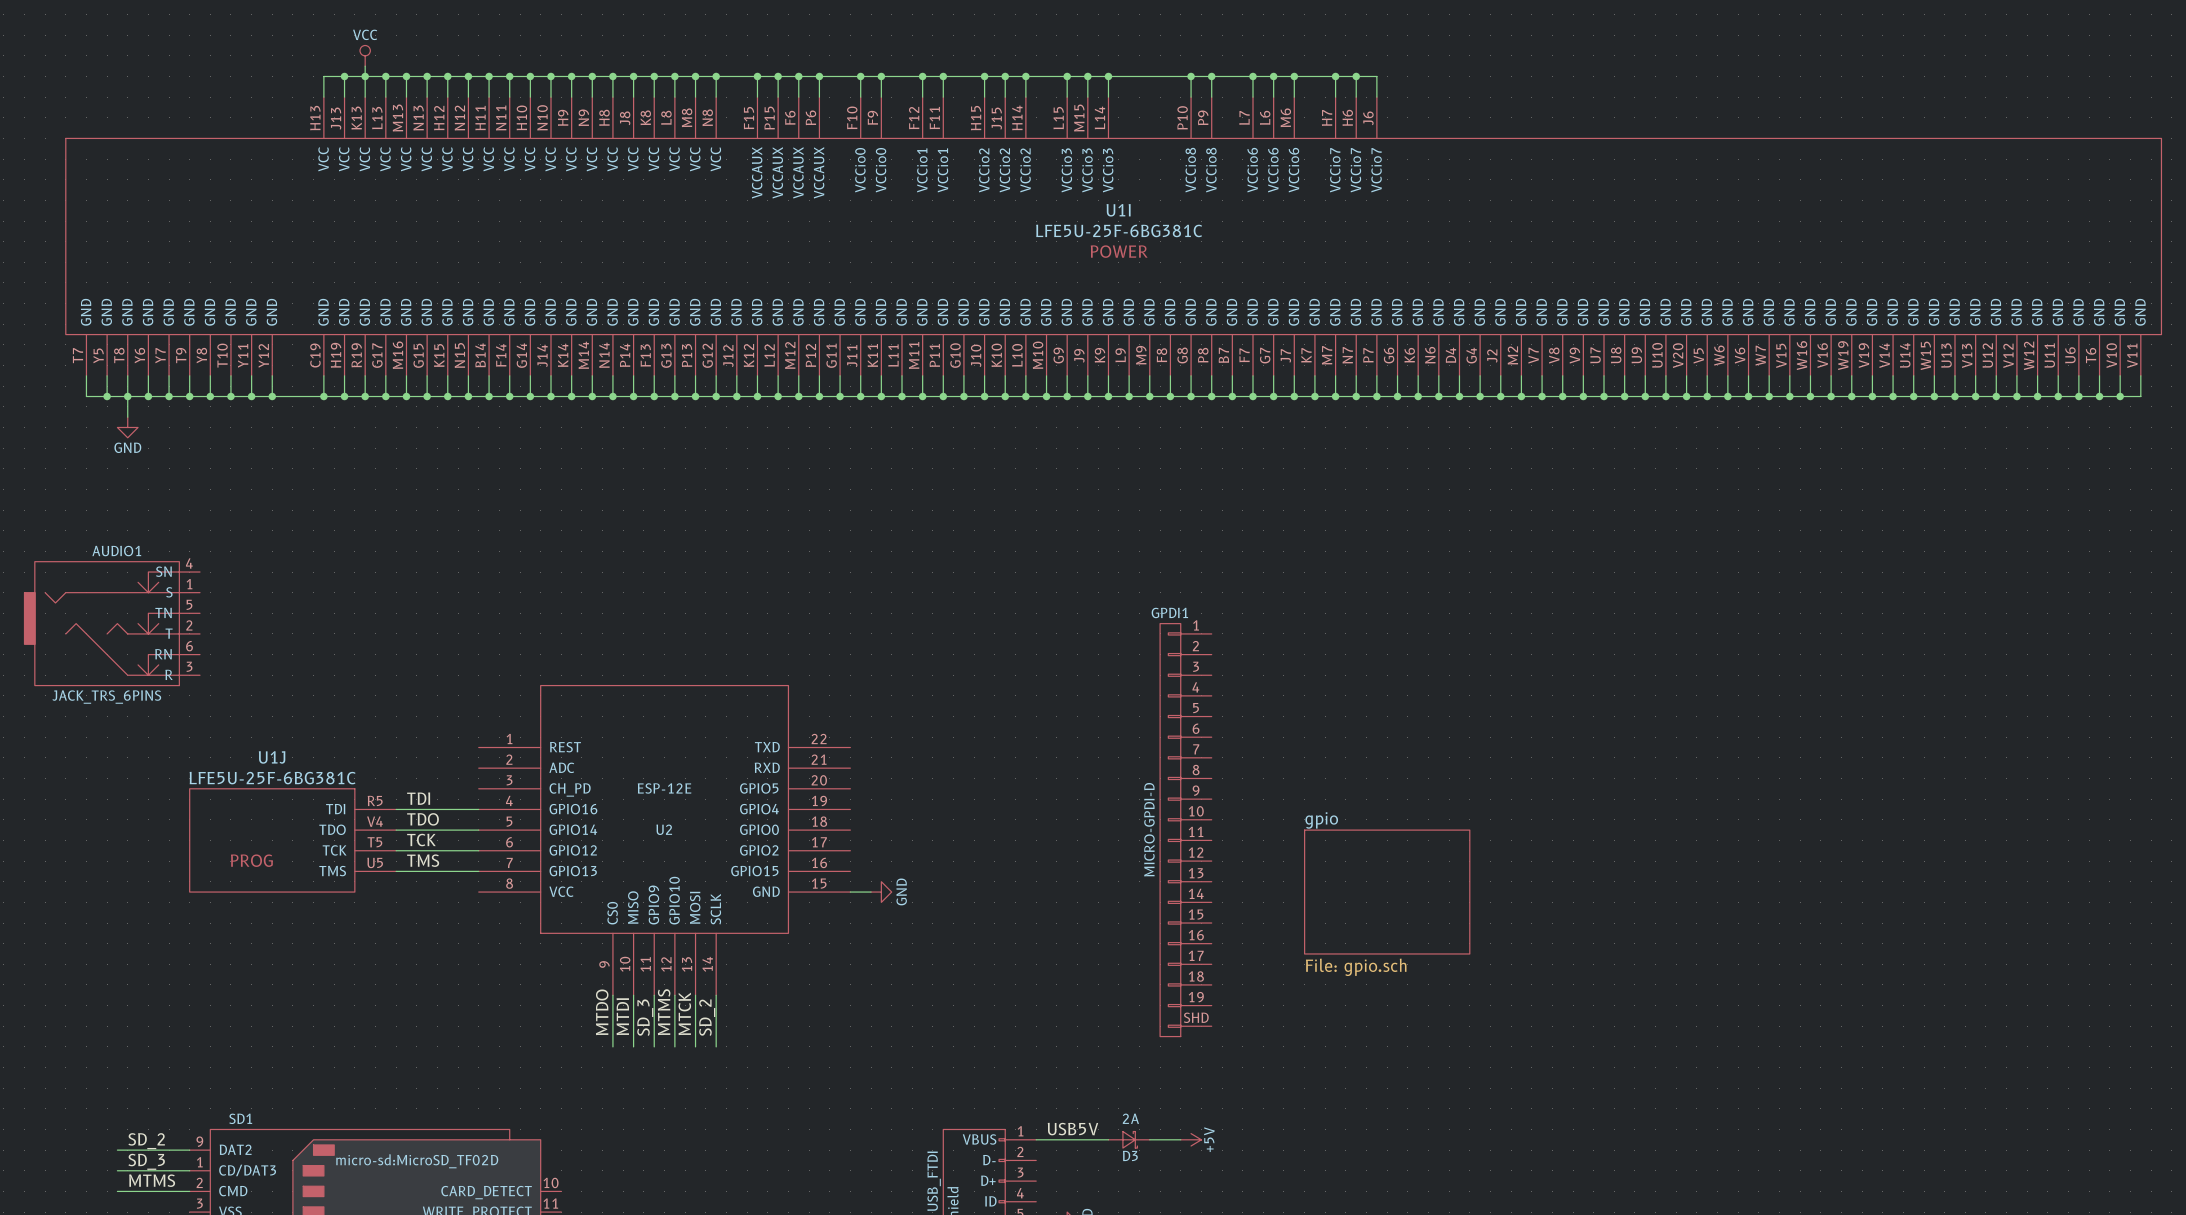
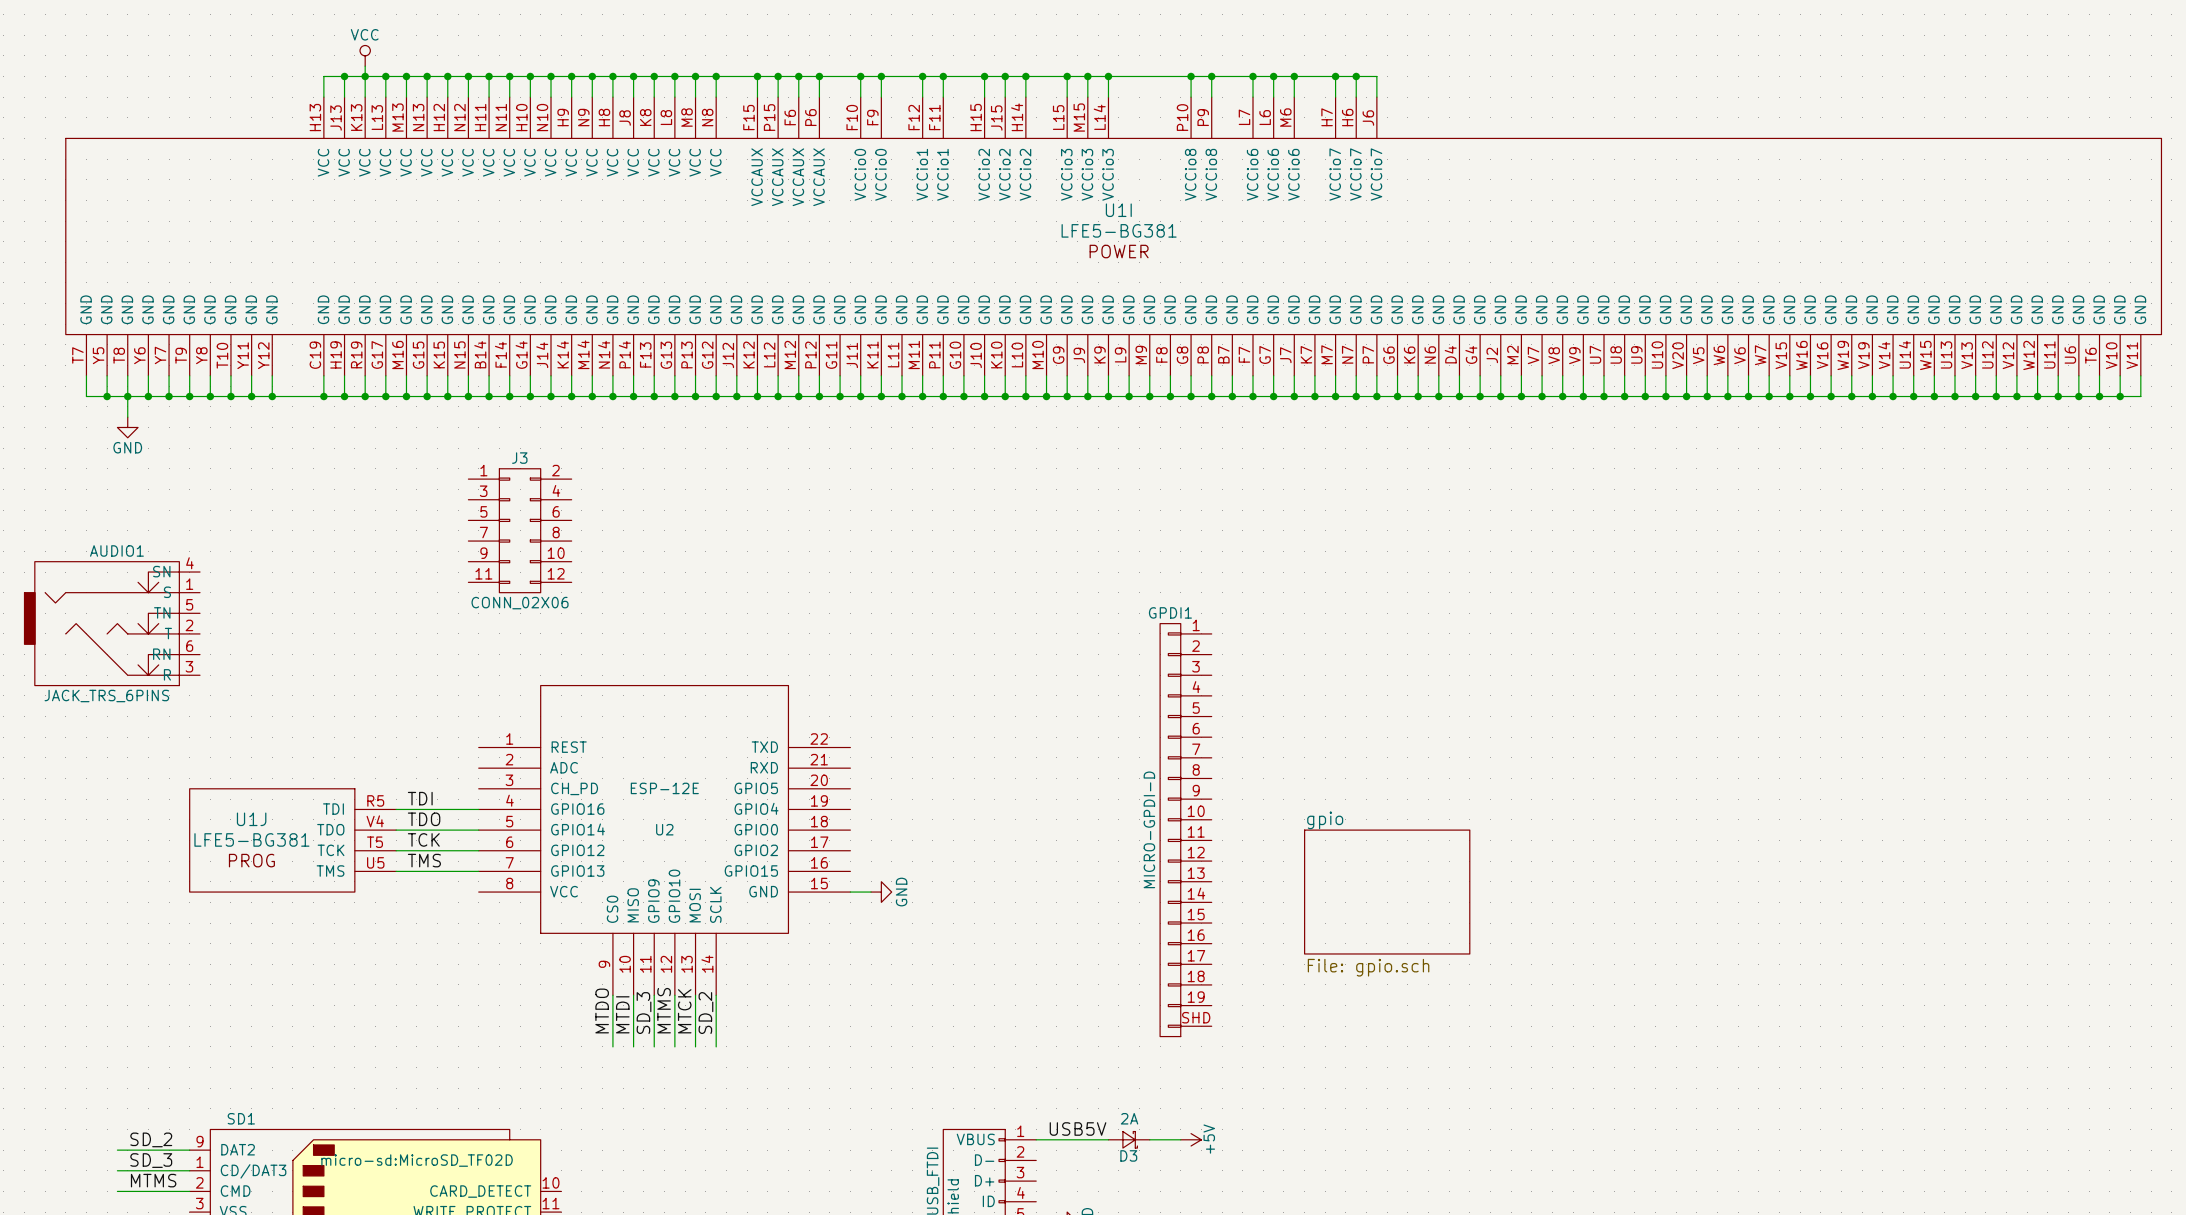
U1I value: LFE5U-25F-6BG381C (1119, 230) -> LFE5-BG381 (1119, 230)
J3: none -> CONN_02X06 (520, 530)
U1J name position: U1J (272, 757) -> U1J (251, 819)
U1J value: LFE5U-25F-6BG381C (272, 778) -> LFE5-BG381 (251, 839)

